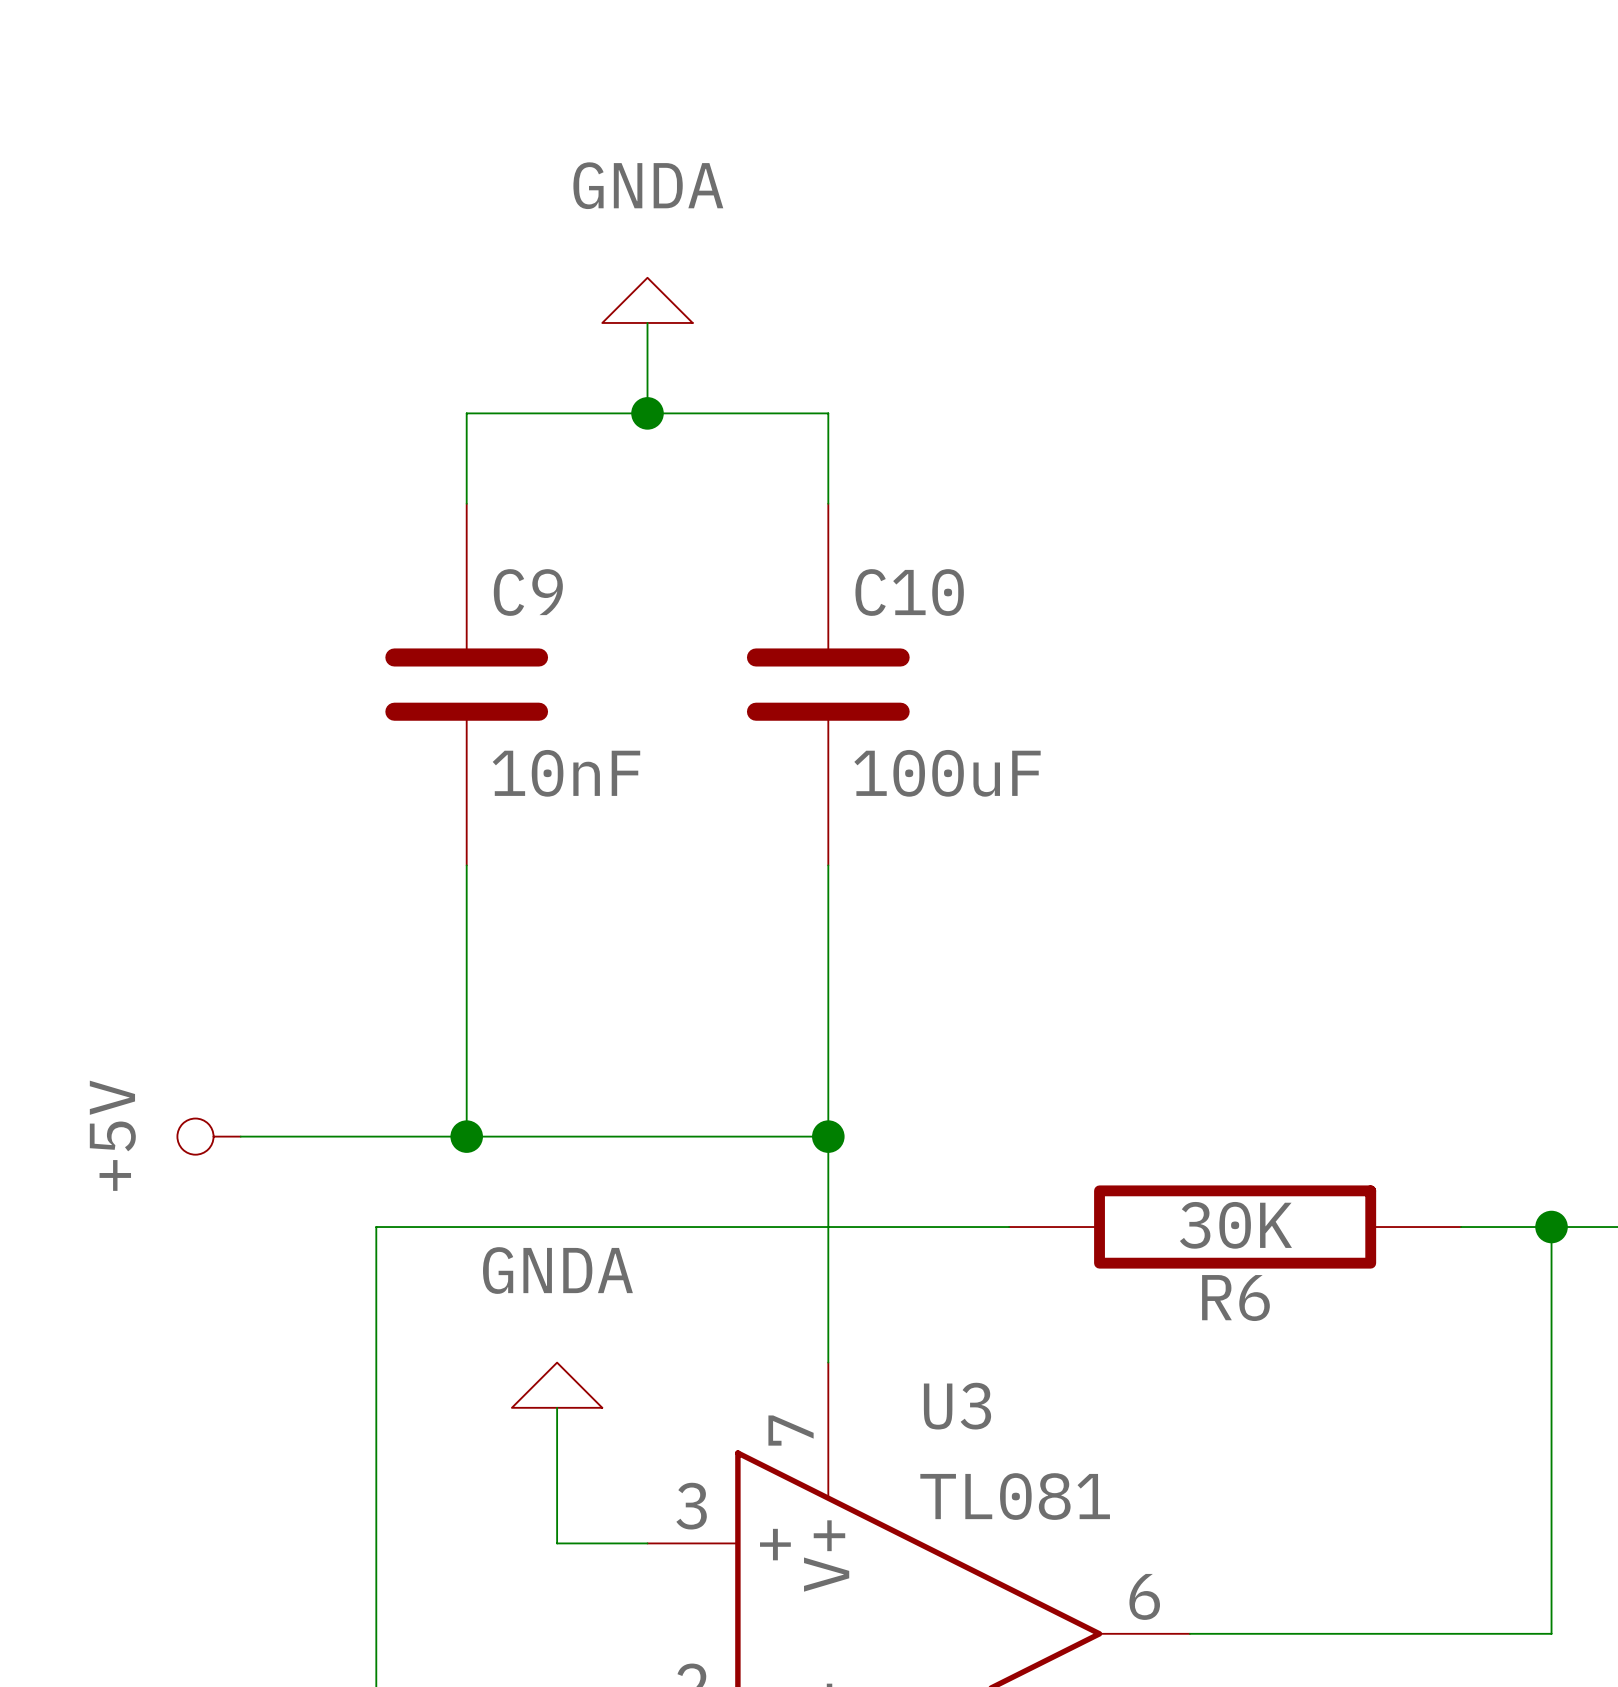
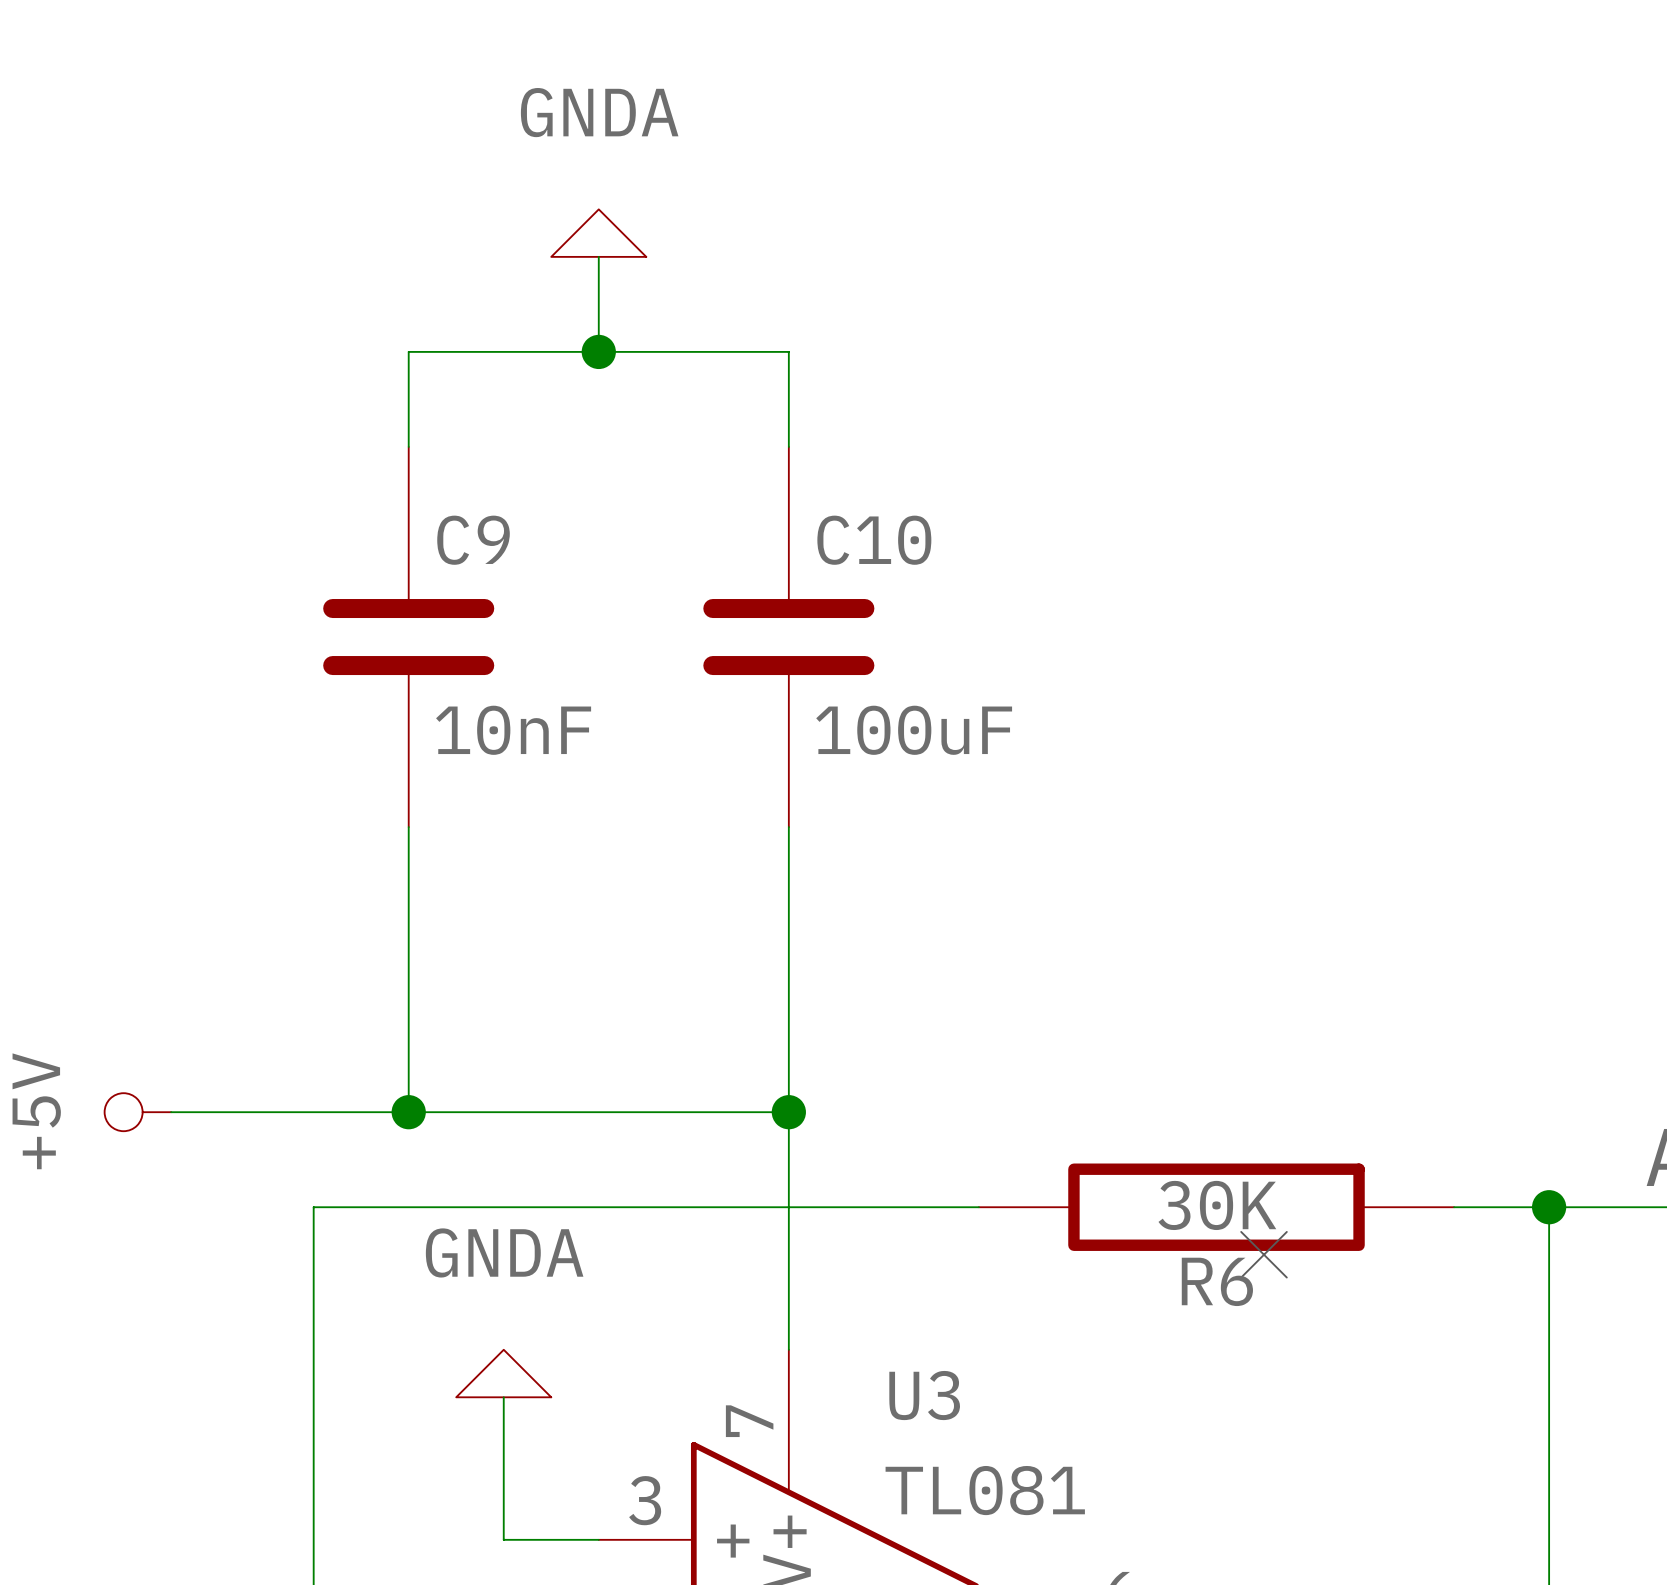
no-connect mark: none -> (1264, 1254)

